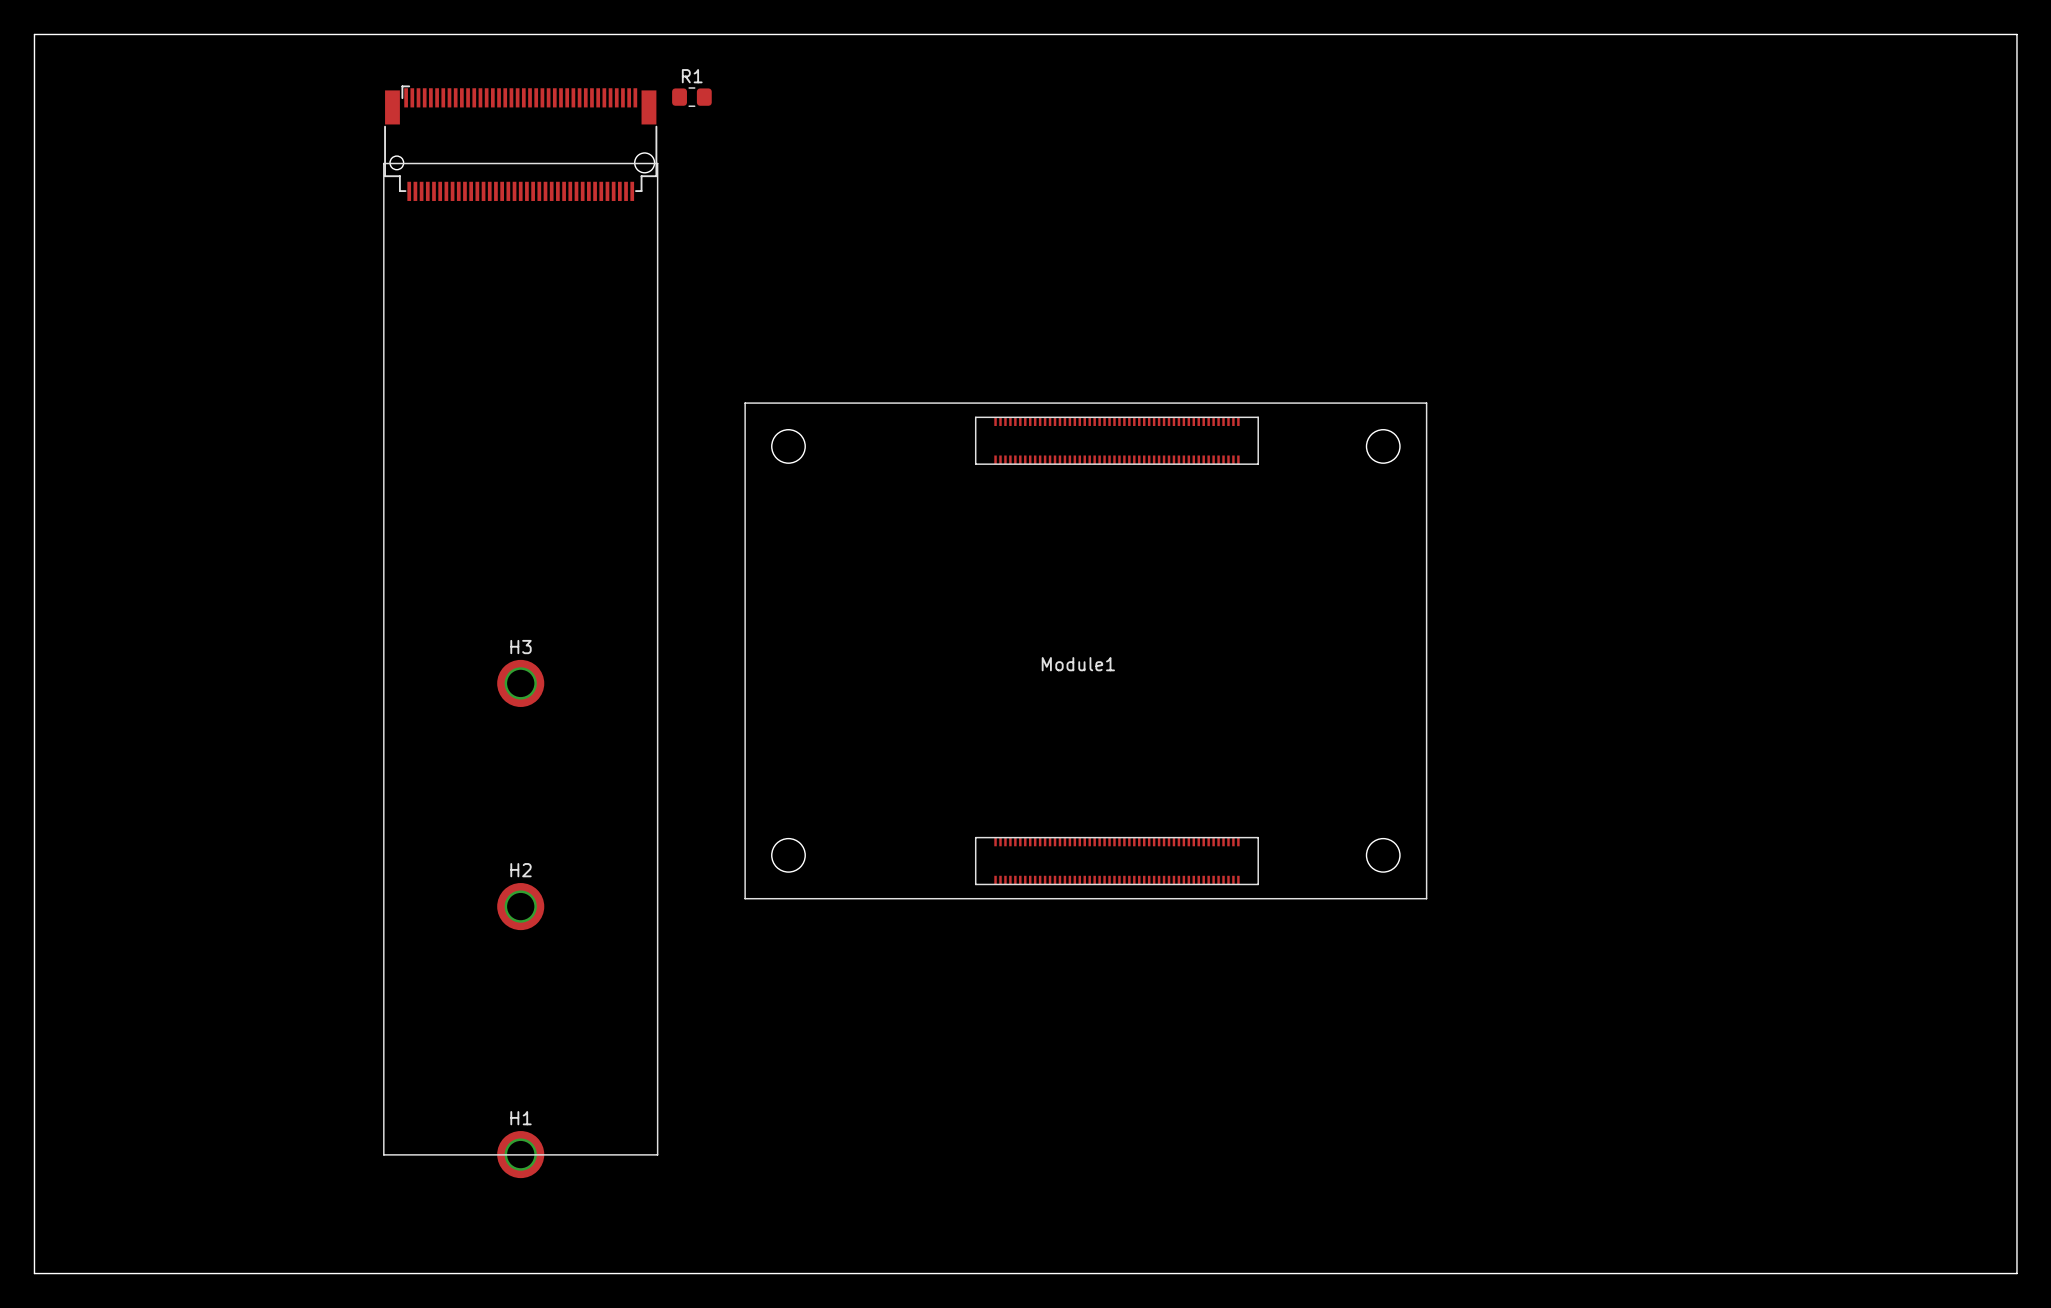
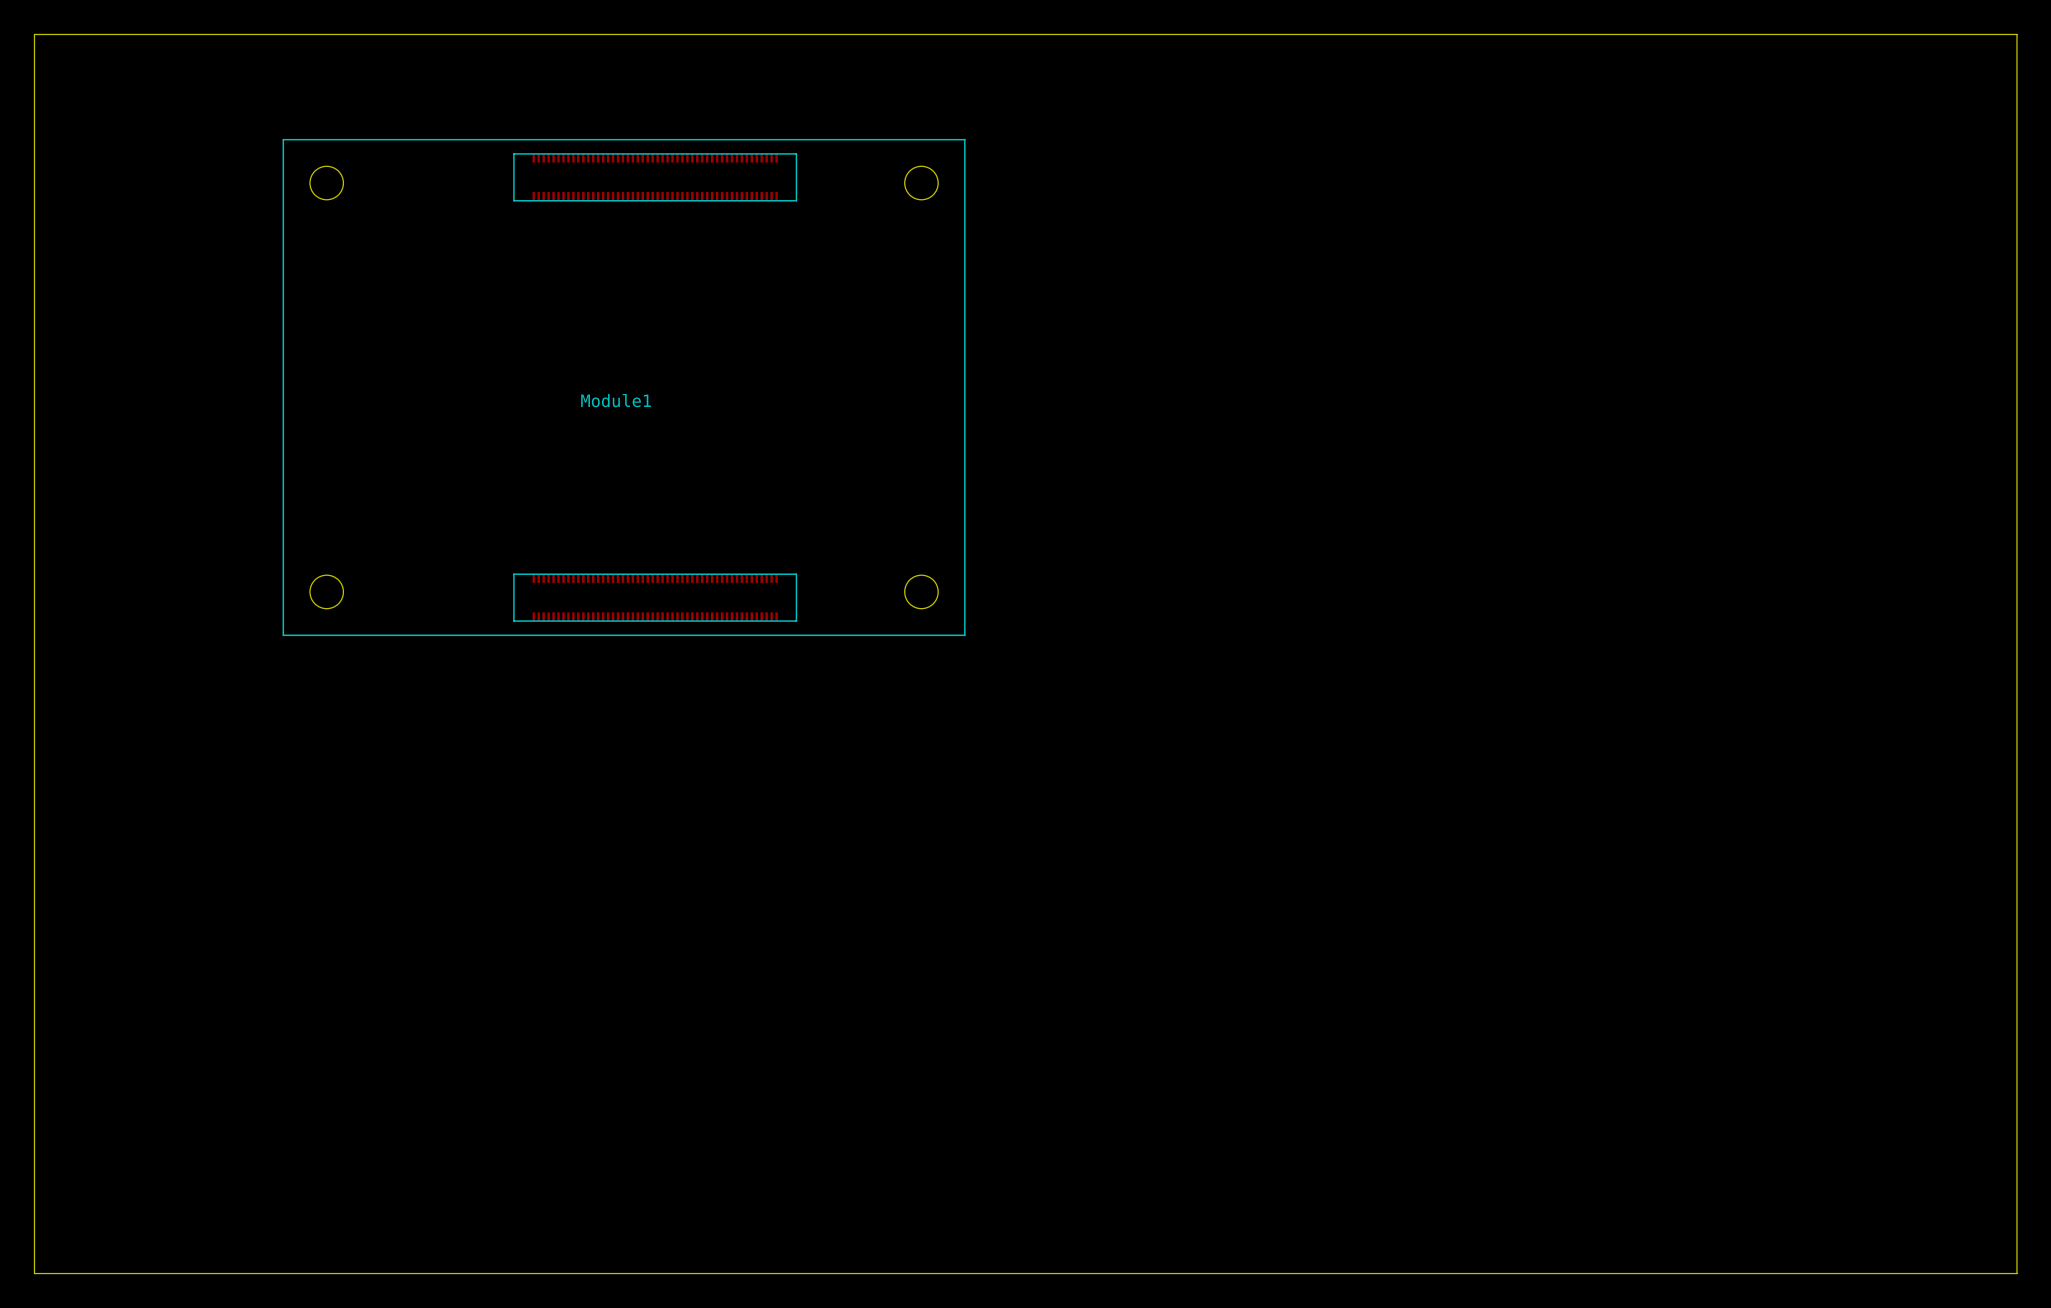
R1: (691, 97) -> none
part: (520, 143) -> none
line: (383, 163) (657, 163) (657, 1154) (383, 1154) (383, 163) -> none
Module1 position: (1085, 650) -> (624, 387)
H3: (520, 683) -> none
H2: (520, 906) -> none
H1: (520, 1154) -> none

